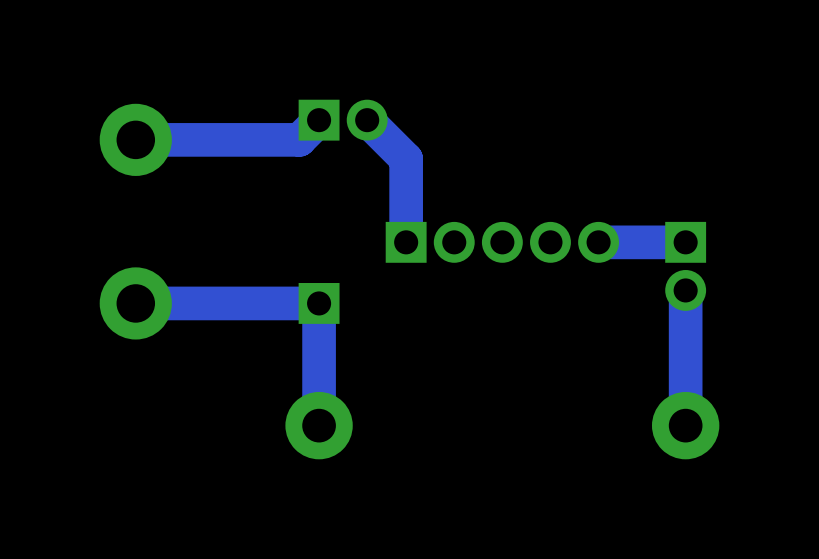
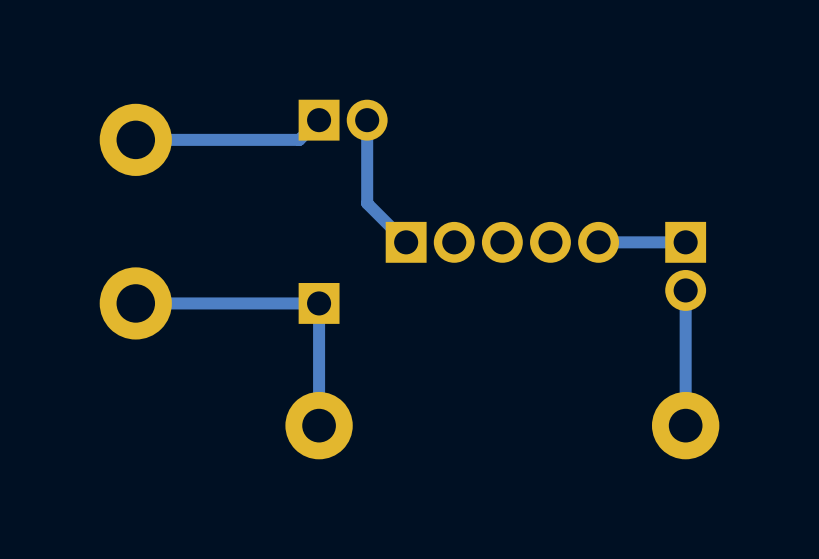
bottom track width: thick (319, 120) (299, 139) (135, 139) -> thin (319, 120) (299, 139) (135, 139)
bottom track: (367, 120) (406, 159) (406, 242) -> (367, 120) (367, 203) (406, 242)
bottom track width: thick (685, 242) (598, 242) -> thin (685, 242) (598, 242)
bottom track width: thick (685, 290) (685, 425) -> thin (685, 290) (685, 425)
bottom track width: thick (135, 303) (319, 303) (319, 425) -> thin (135, 303) (319, 303) (319, 425)

